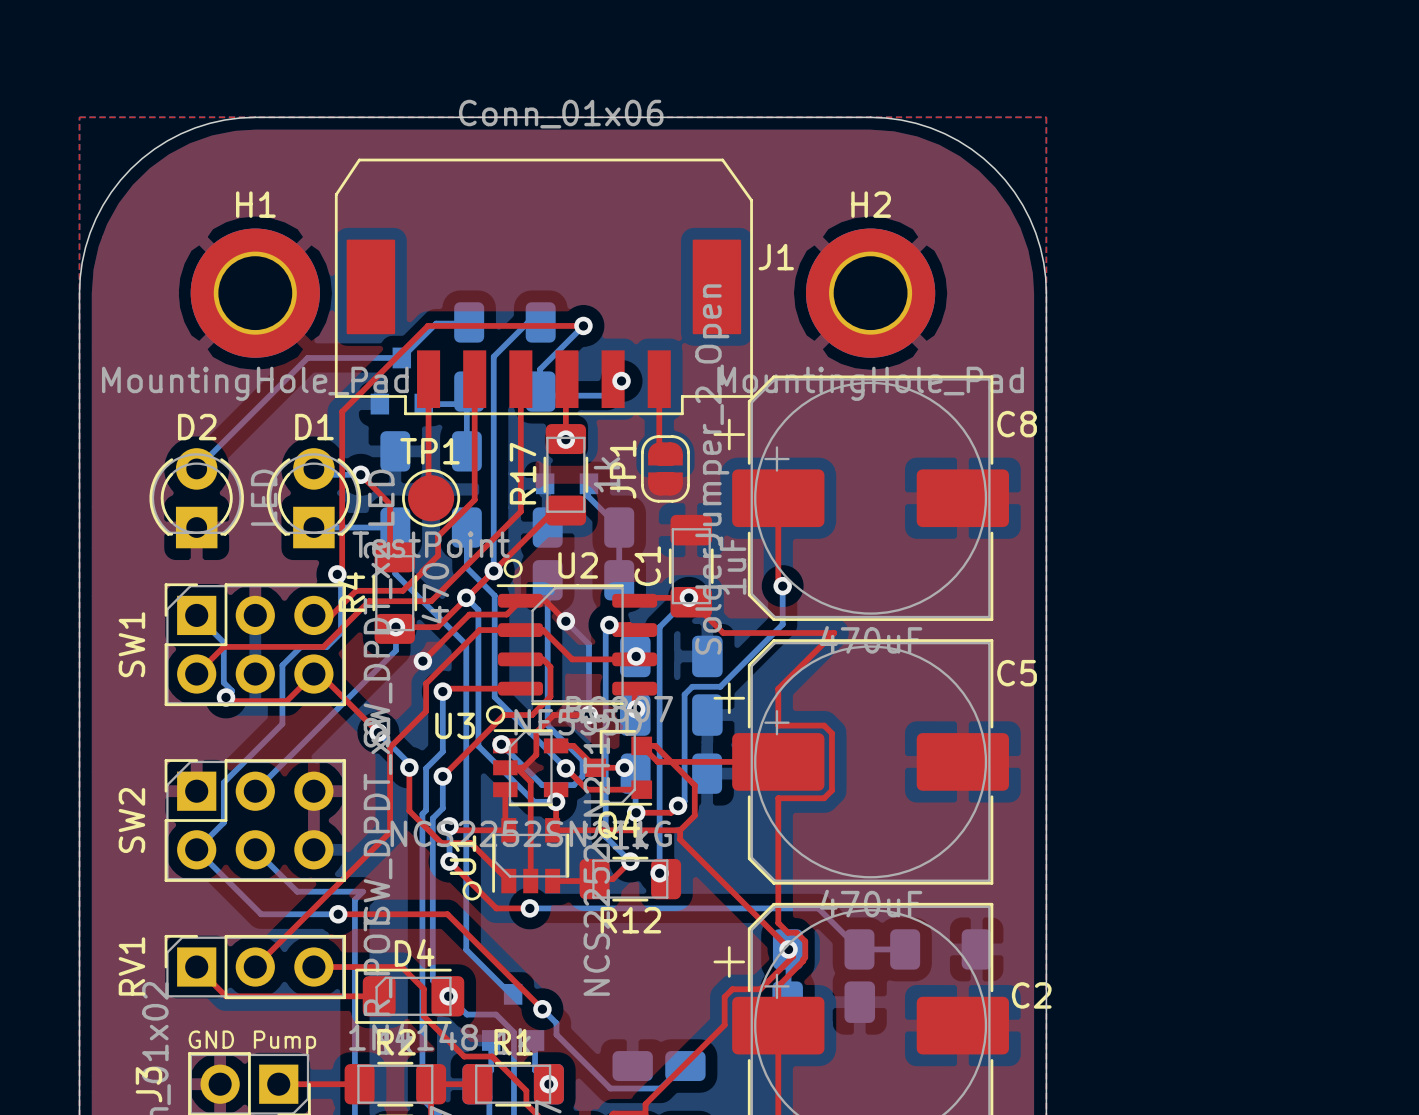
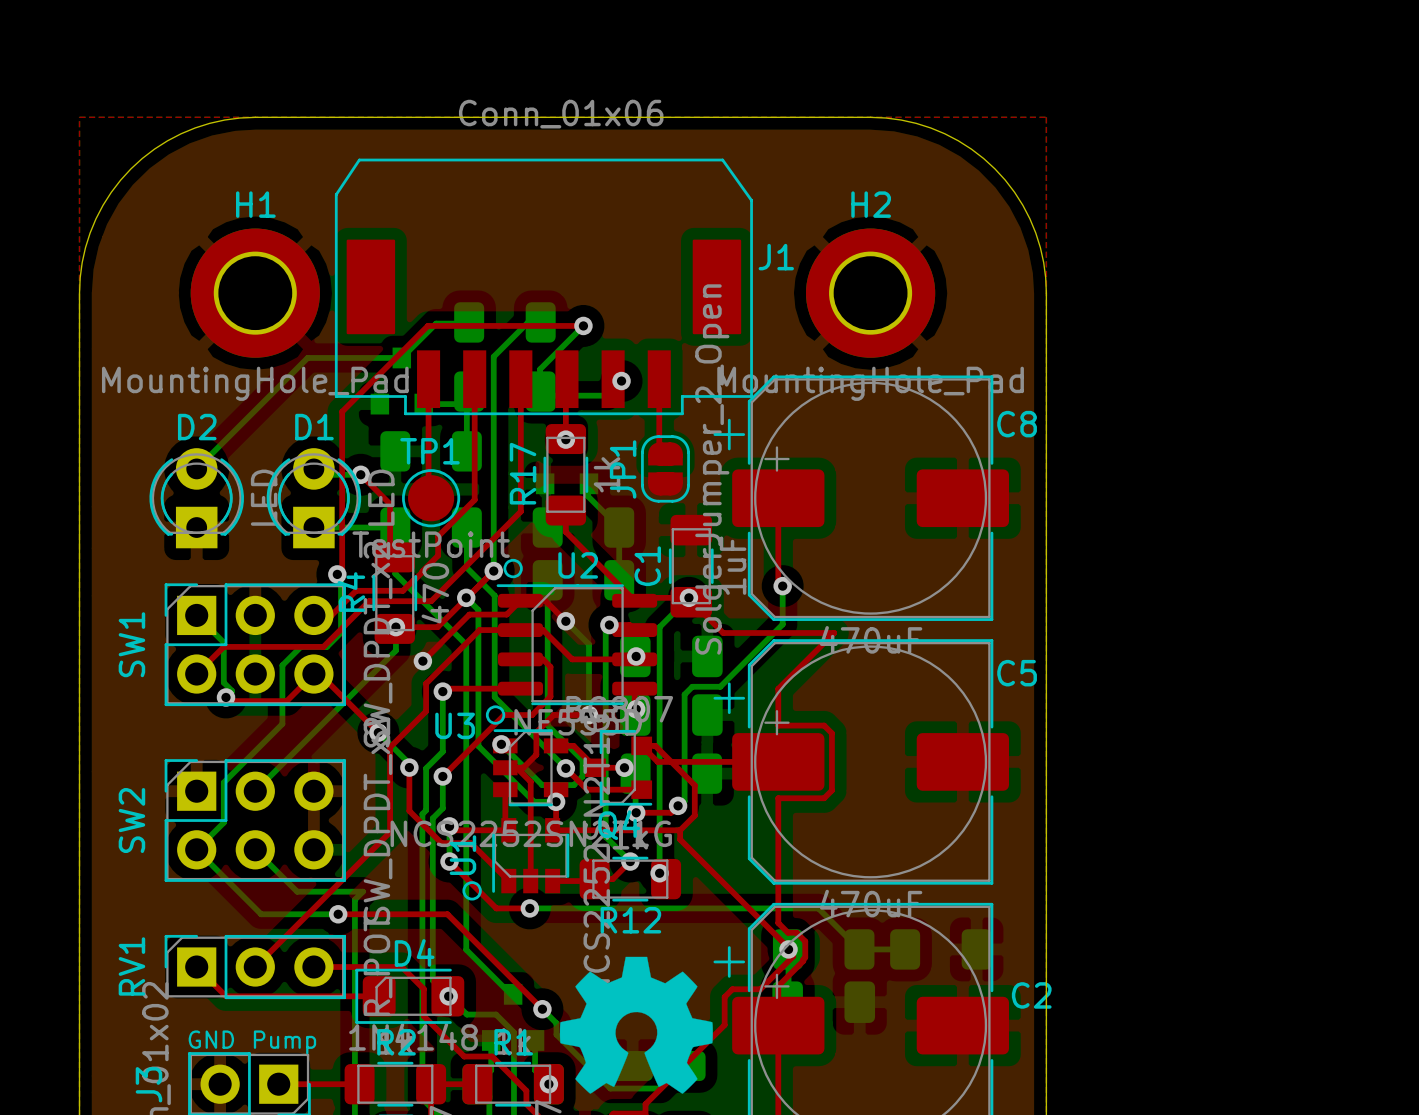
top track: (565, 510) (554, 510) (493, 571) -> (565, 510) (565, 531) (634, 600)
drawing: none -> [559, 956, 713, 1094]

